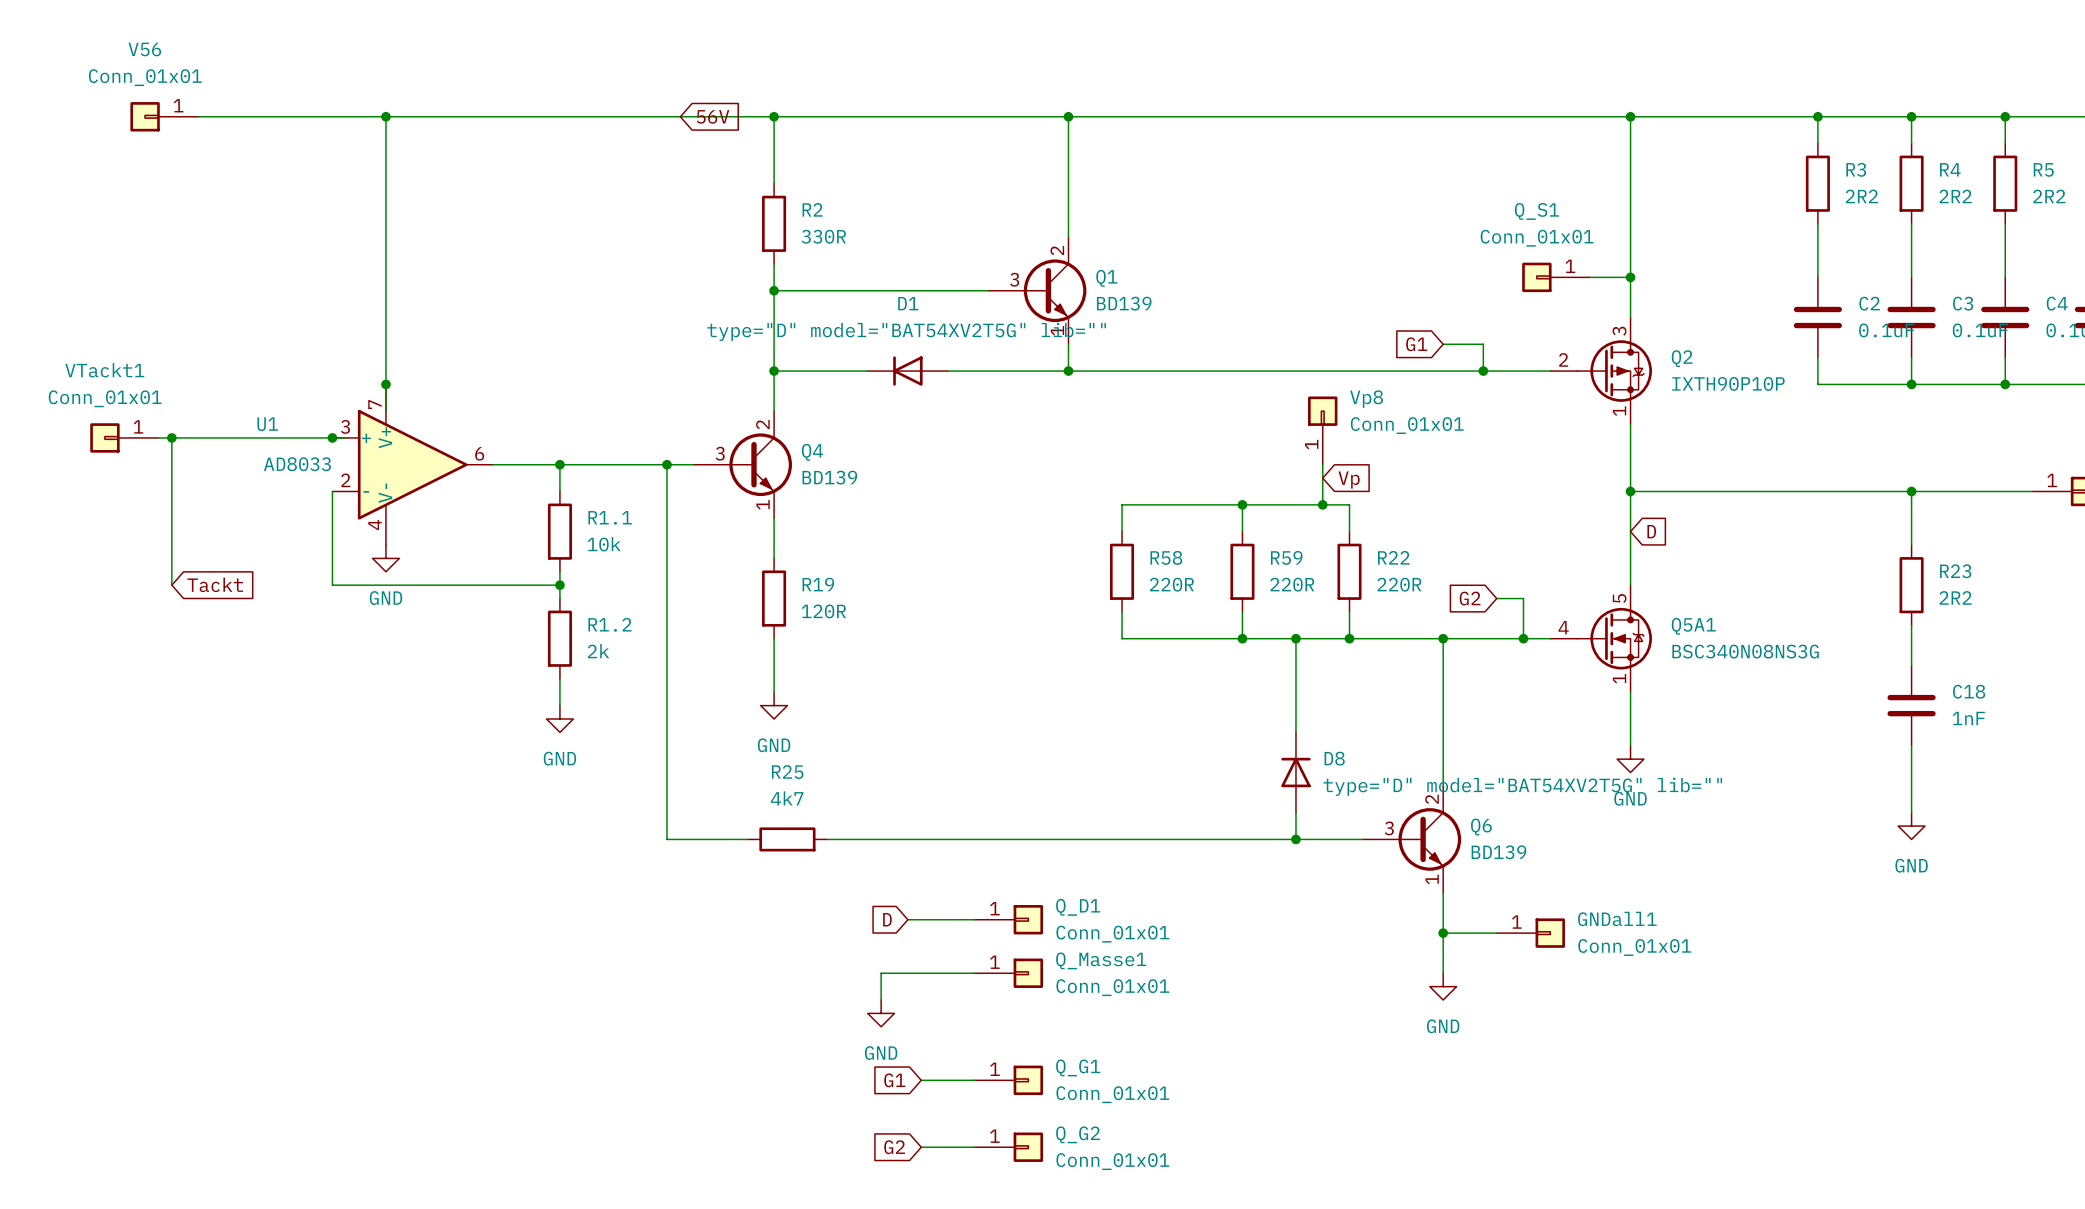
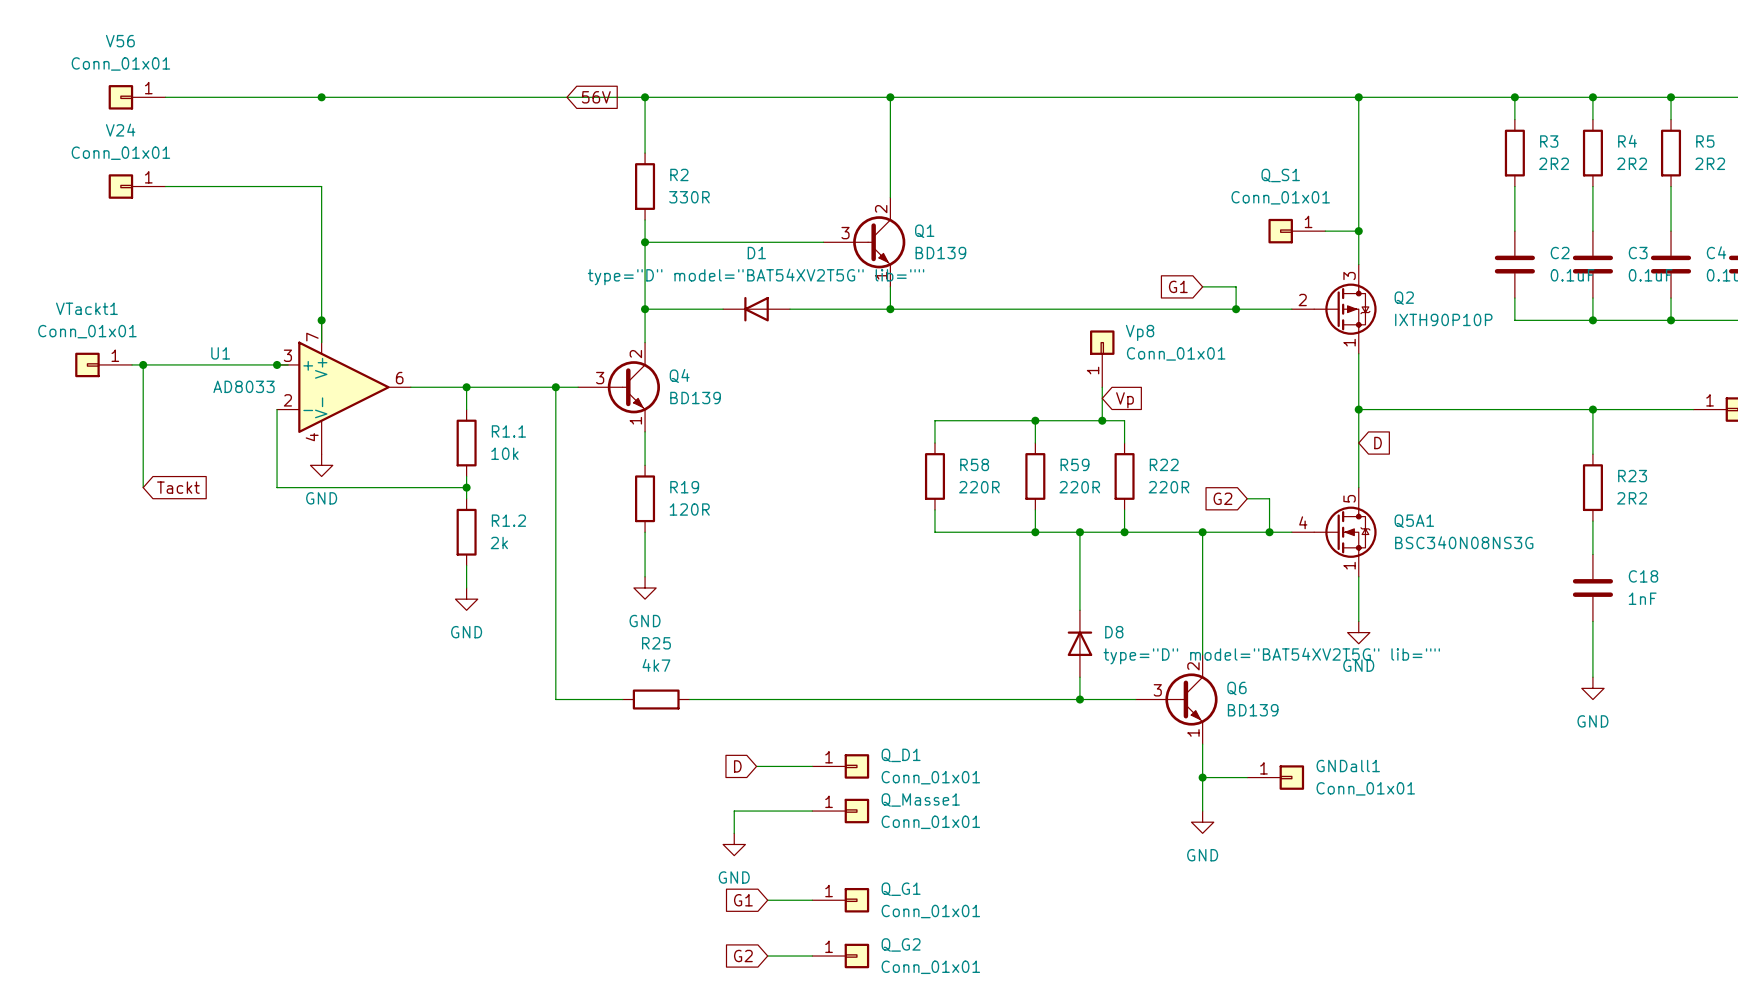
wire: (385, 116) (385, 223) -> (165, 186) (321, 186)
V24: none -> Conn_01x01 (137, 186)

